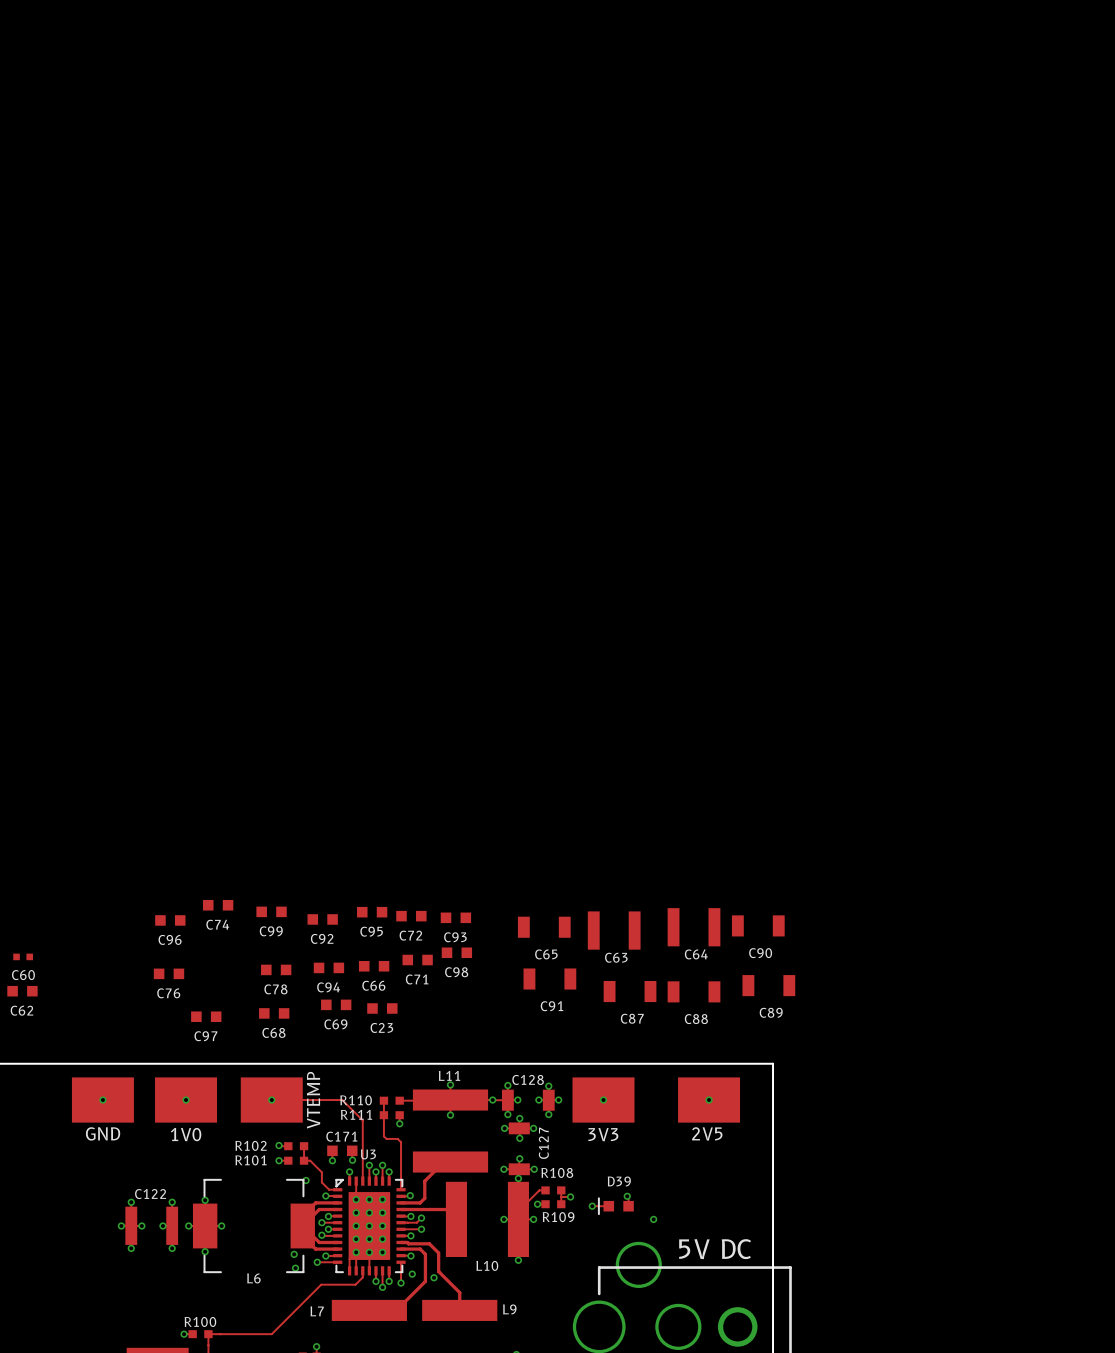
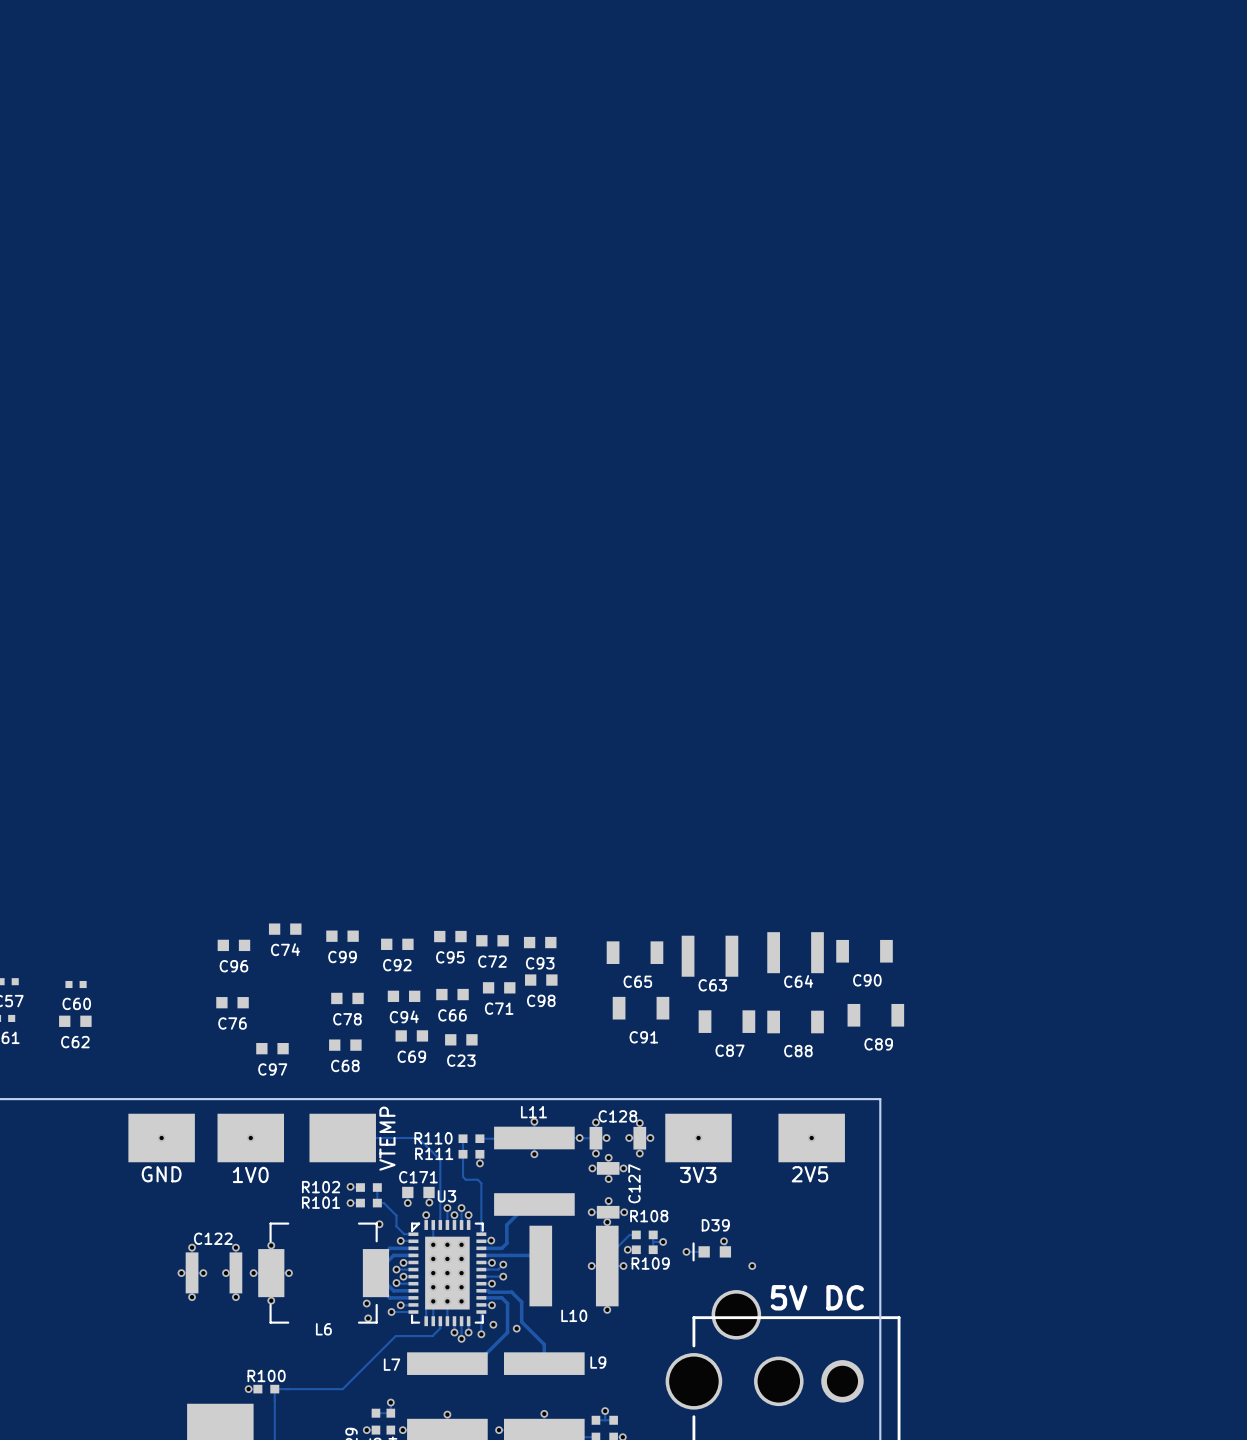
via: (271, 1100) -> none

